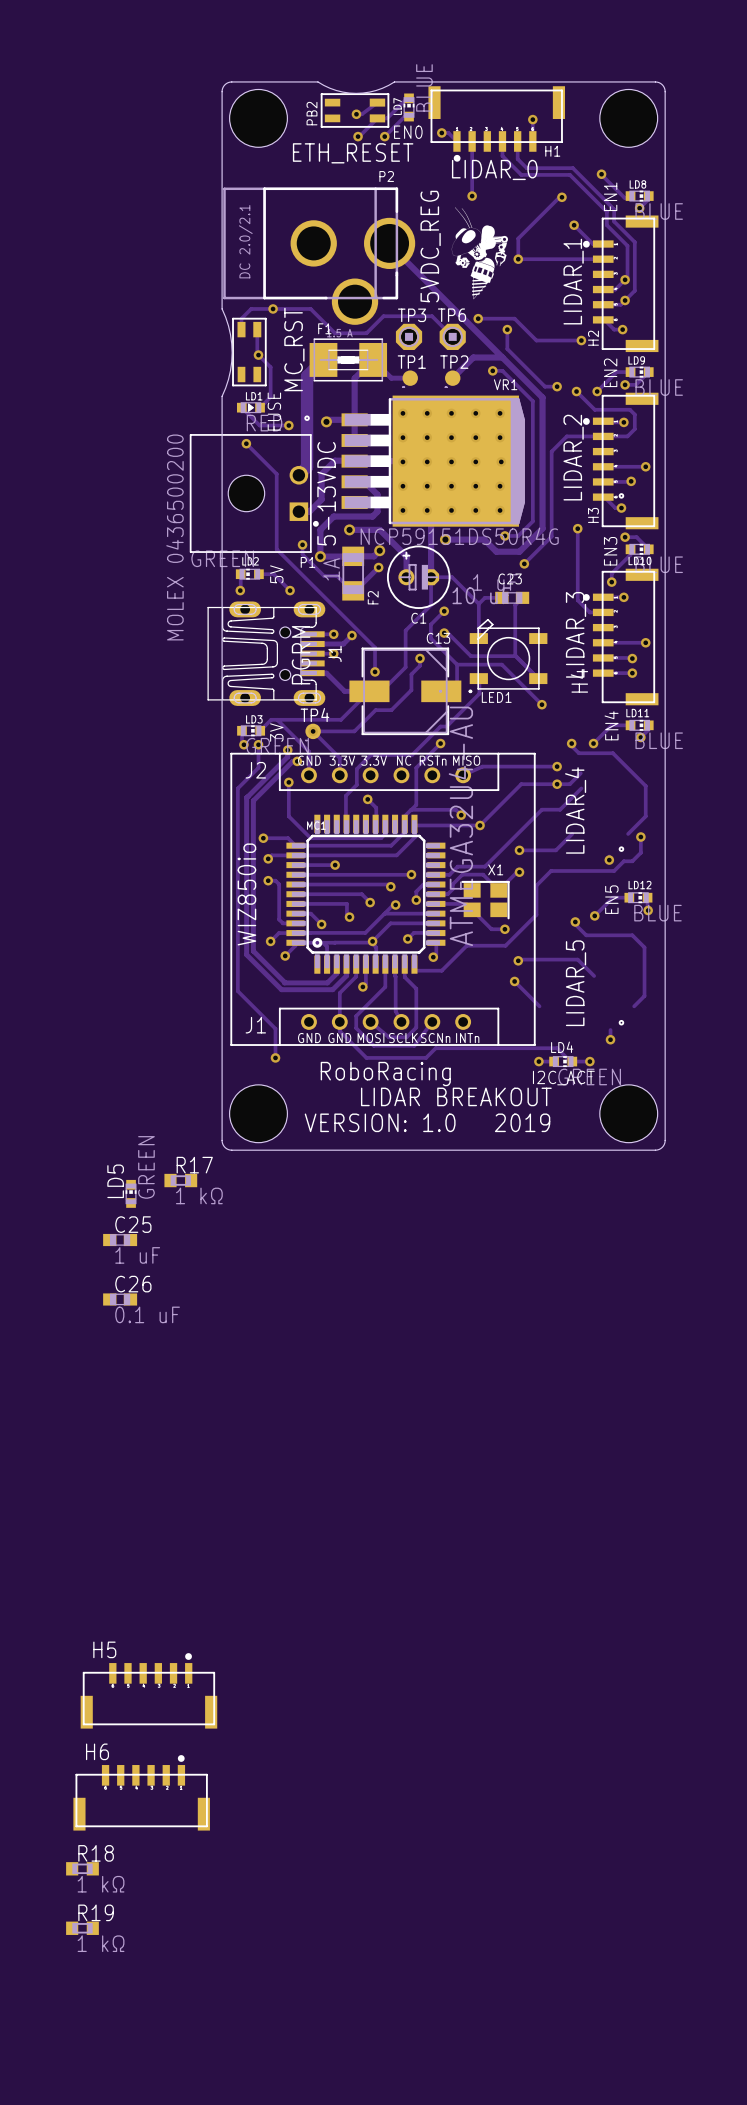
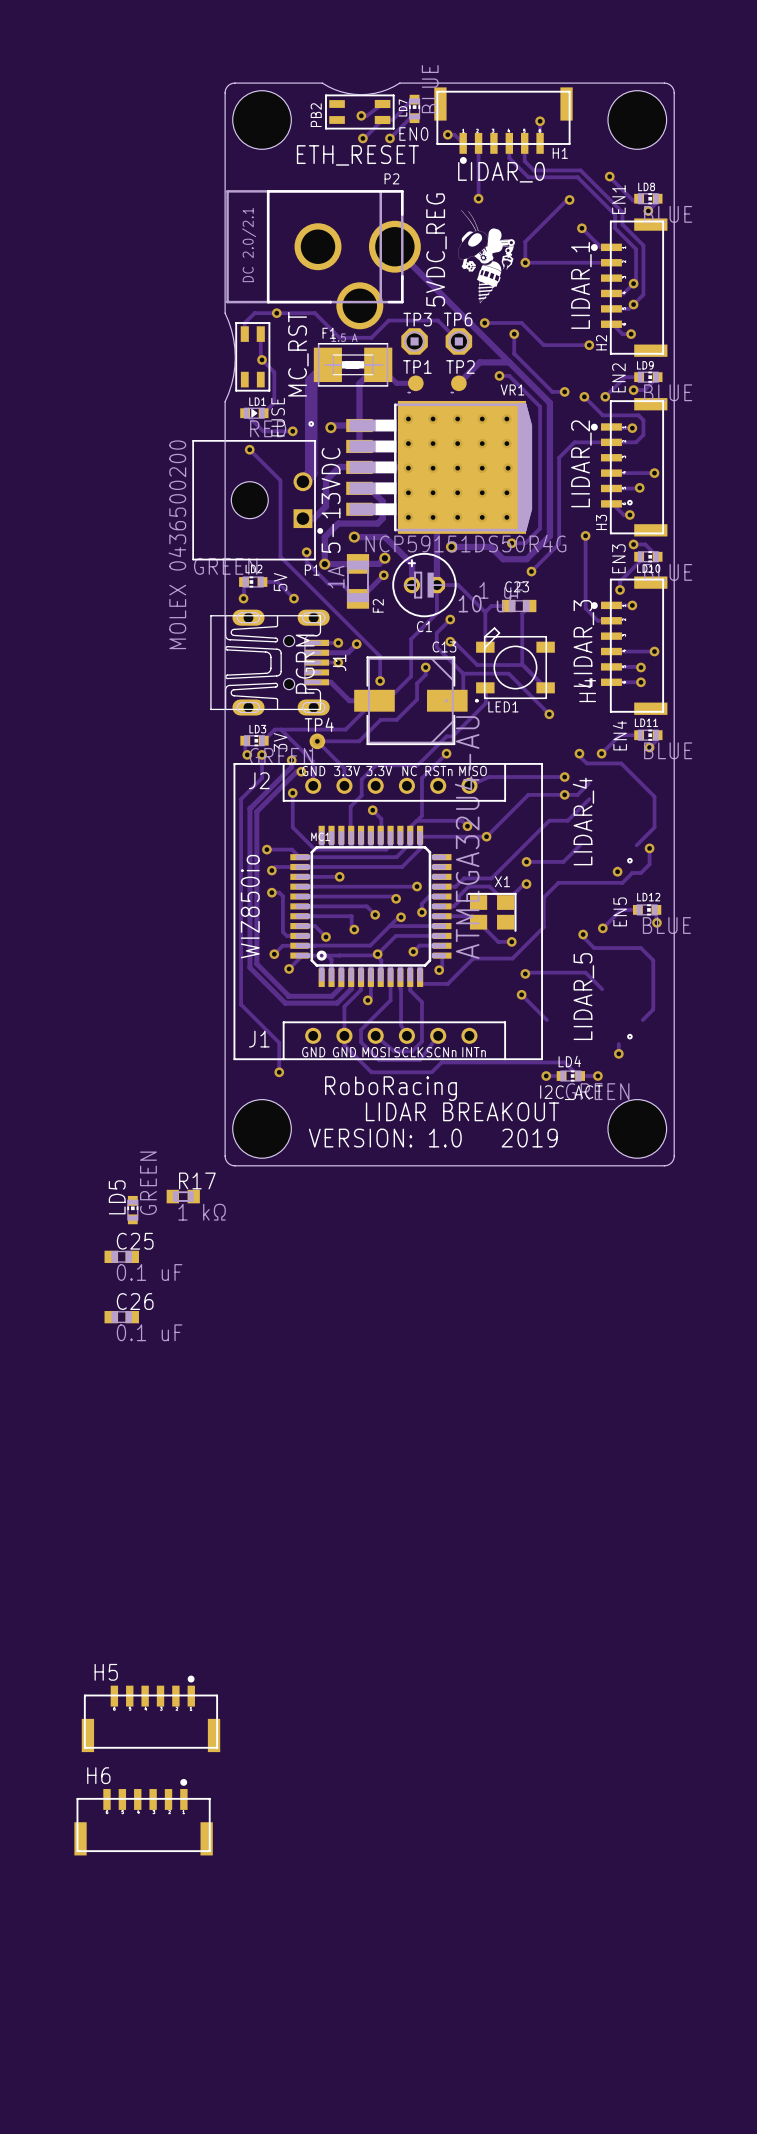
C25 value: 1 uF (137, 1255) -> 0.1 uF (149, 1272)
R18: 1 kΩ (82, 1868) -> none
R19: 1 kΩ (82, 1928) -> none

